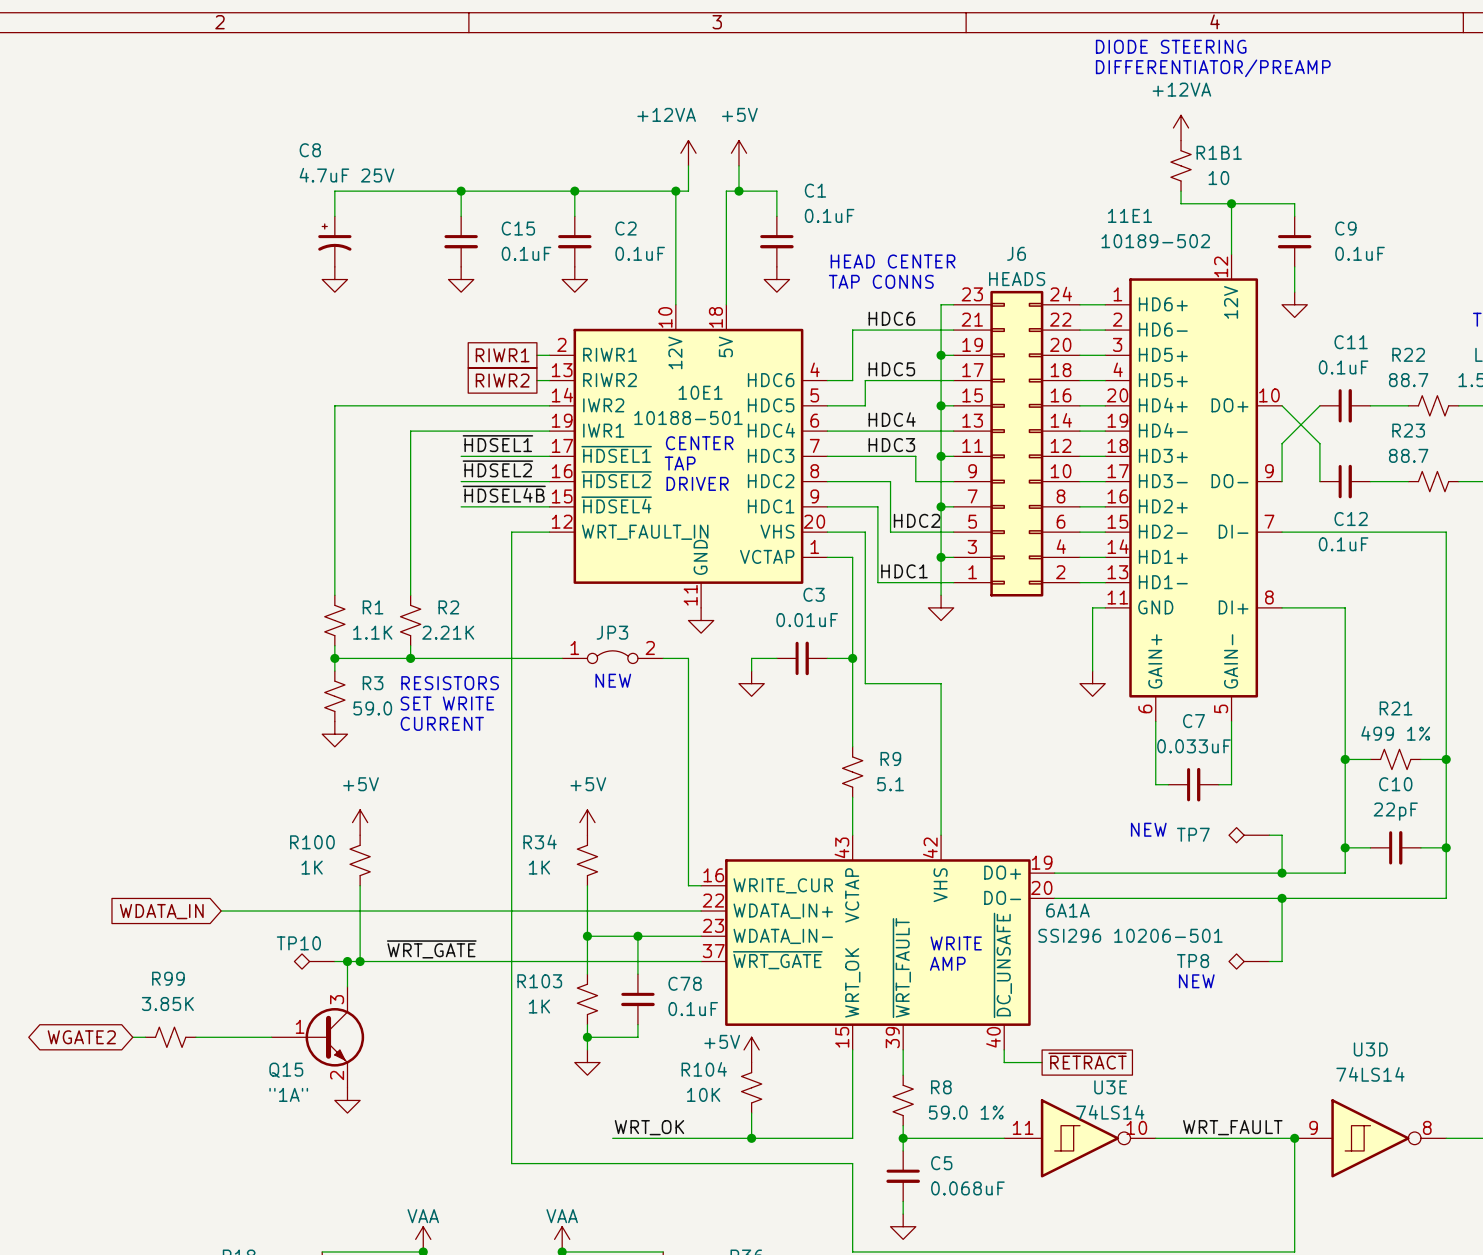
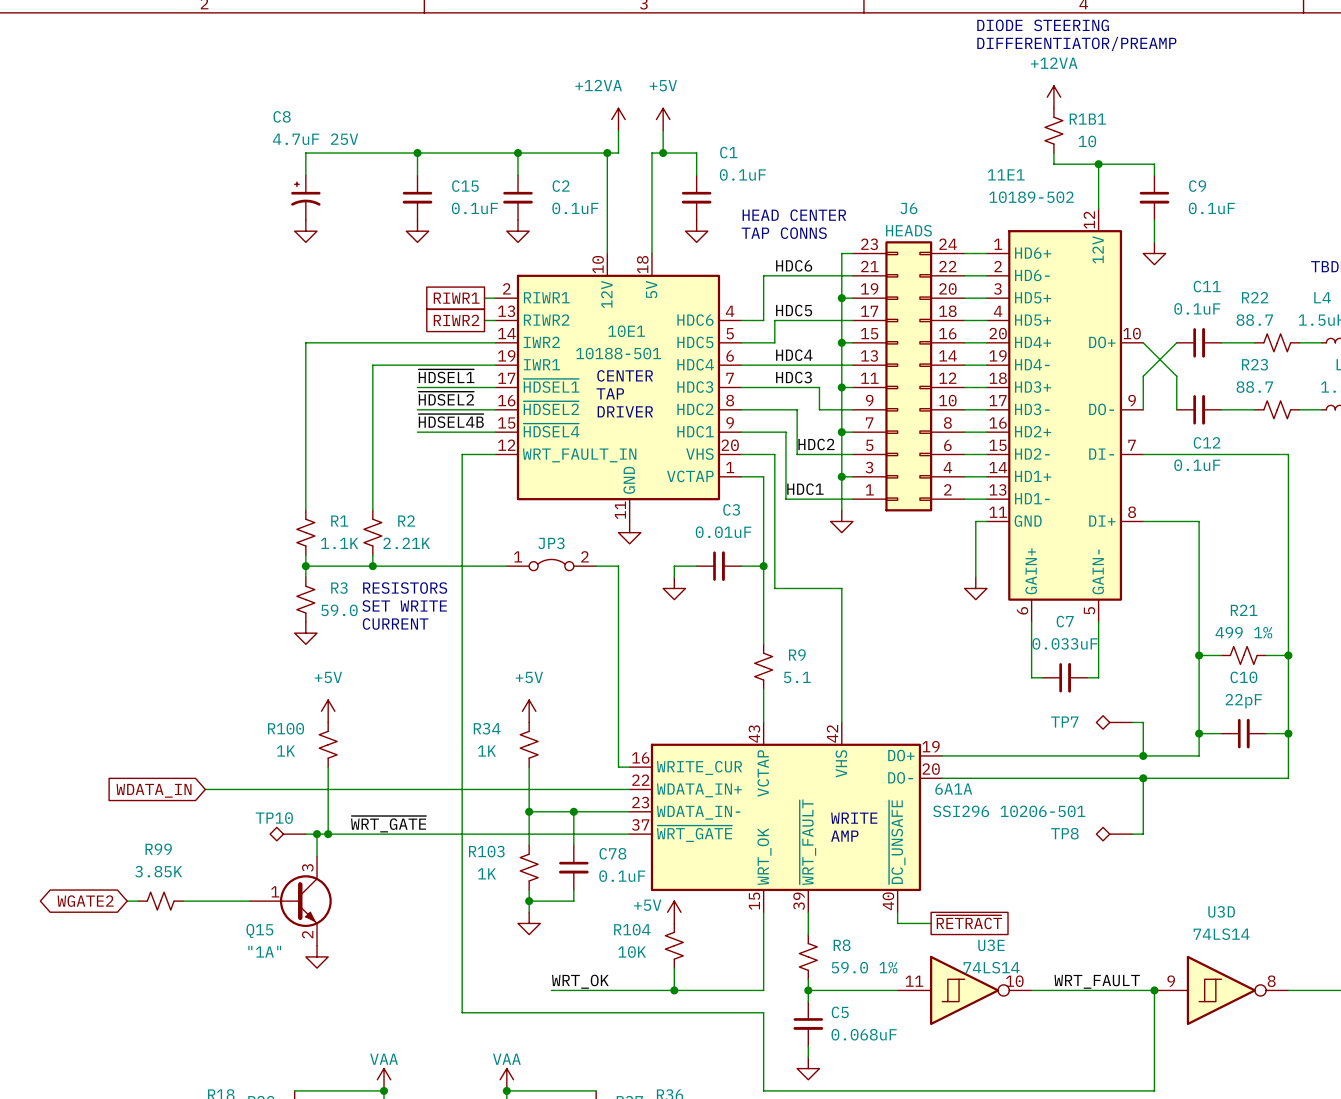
text: NEW (613, 680) -> none
text: NEW (1148, 829) -> none
text: NEW (1196, 981) -> none

